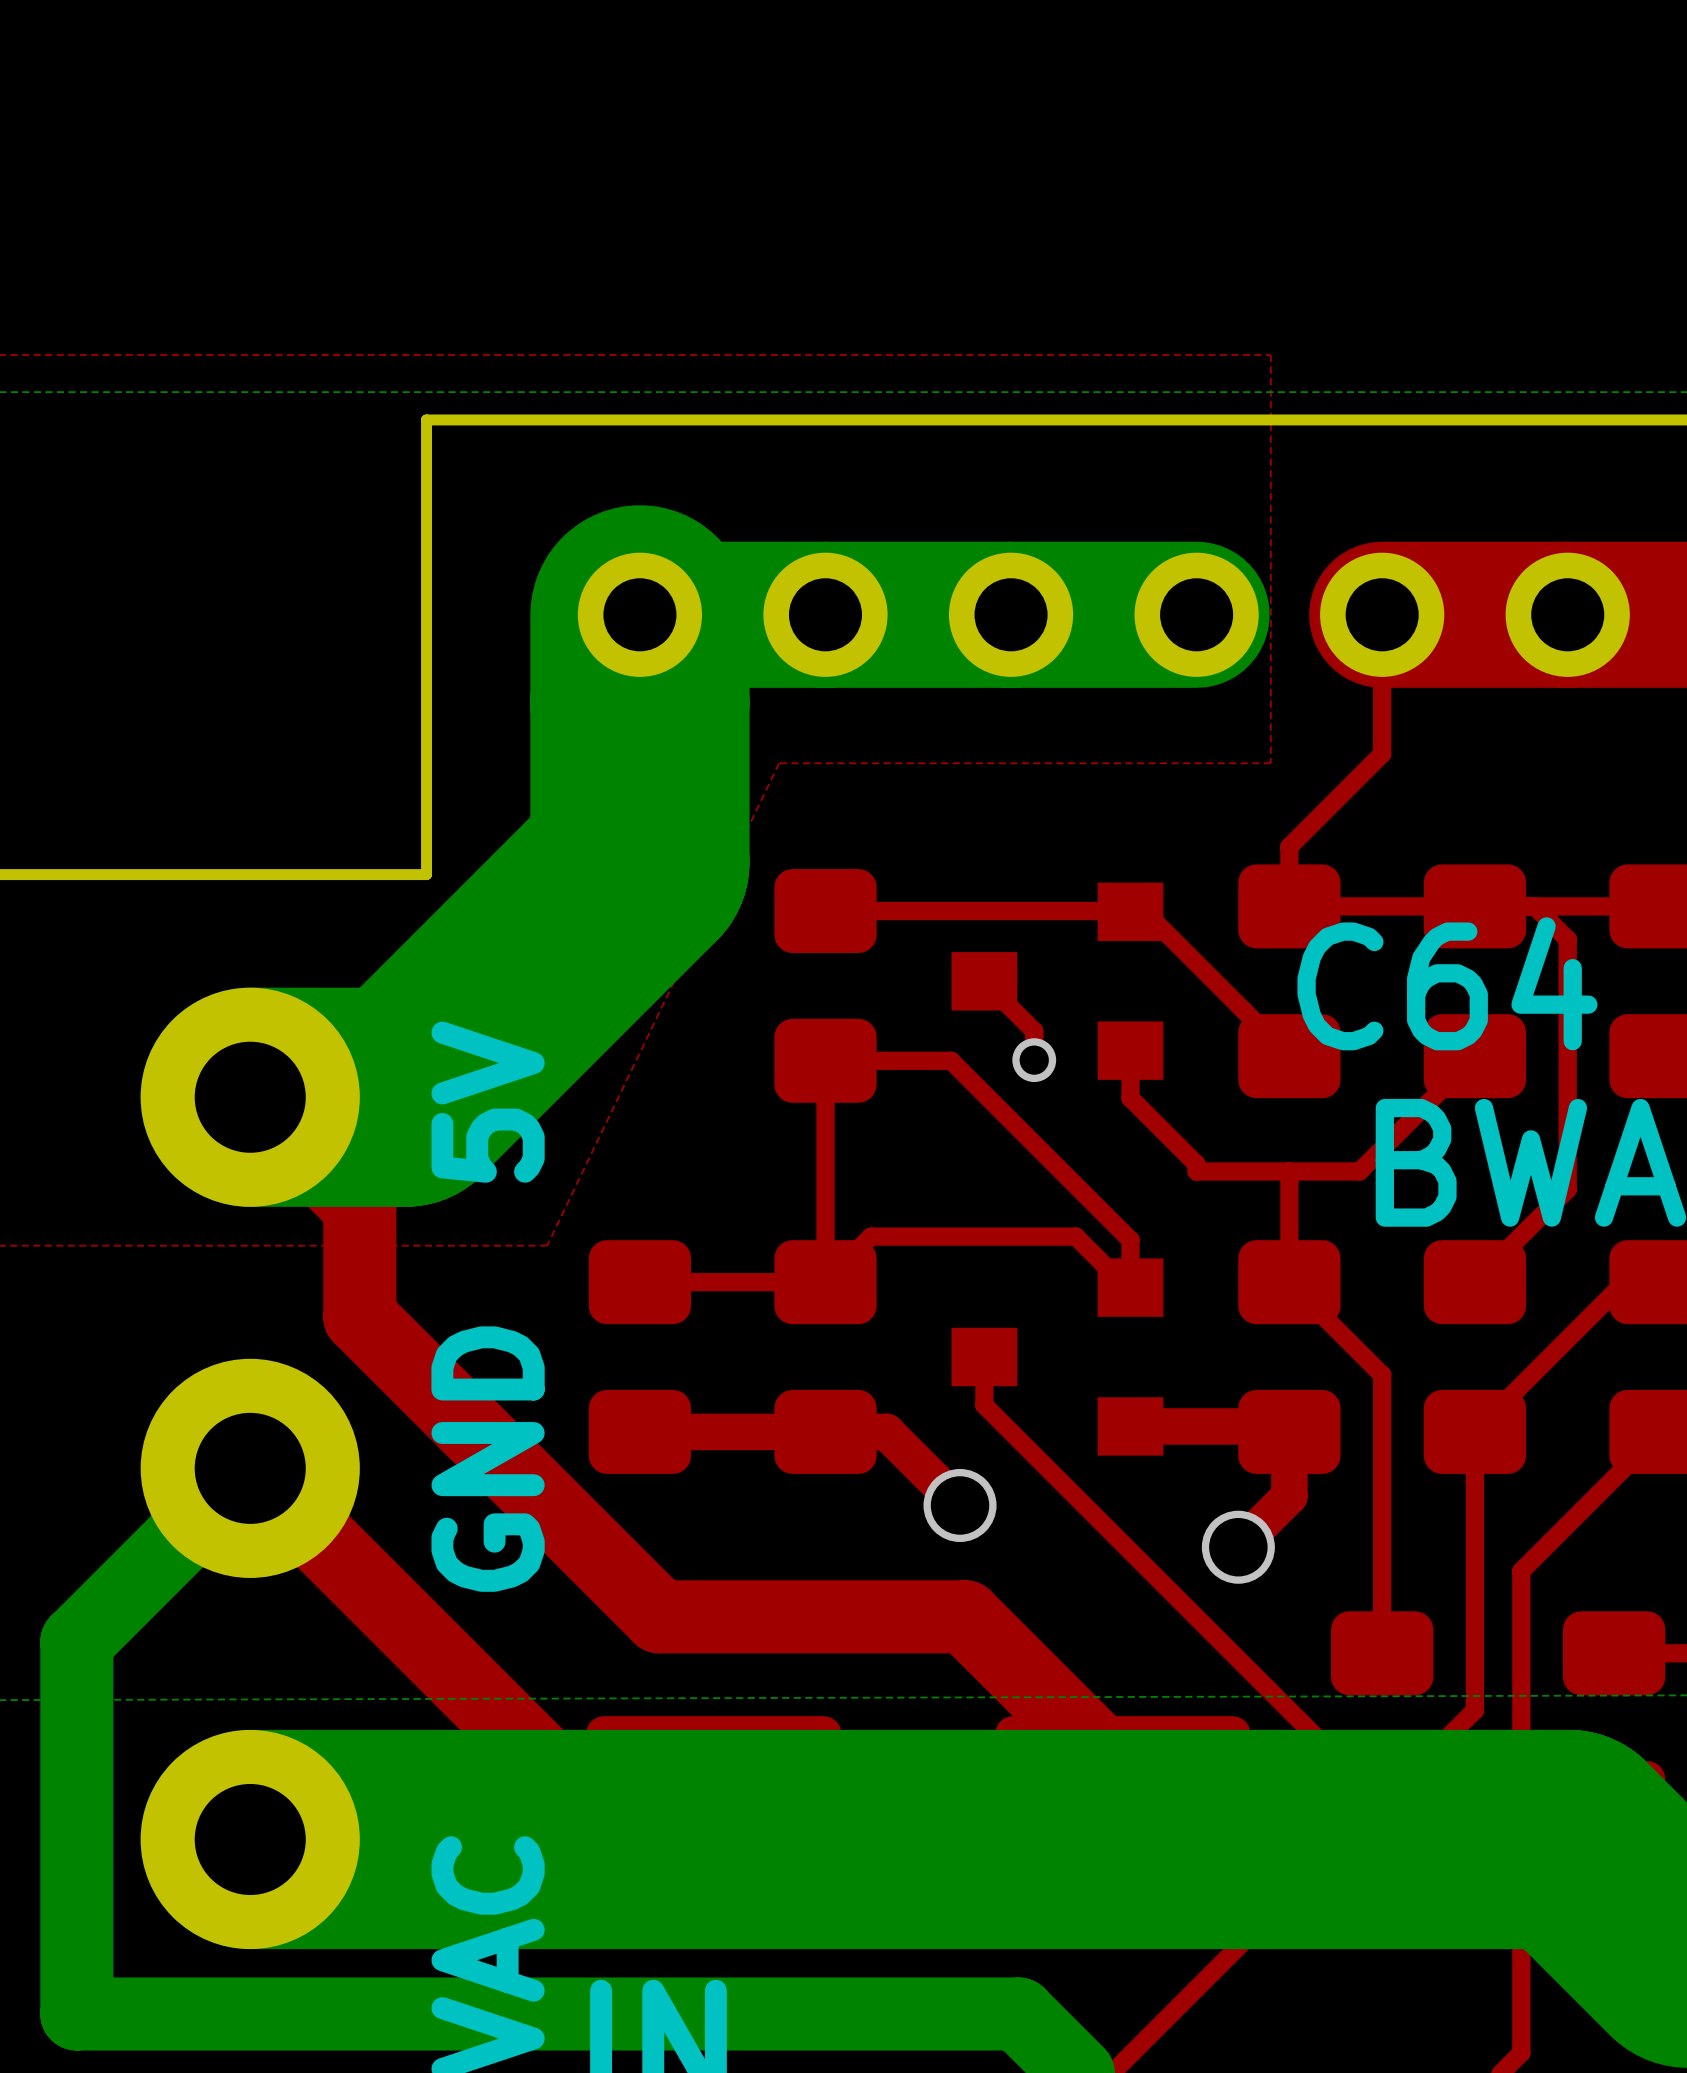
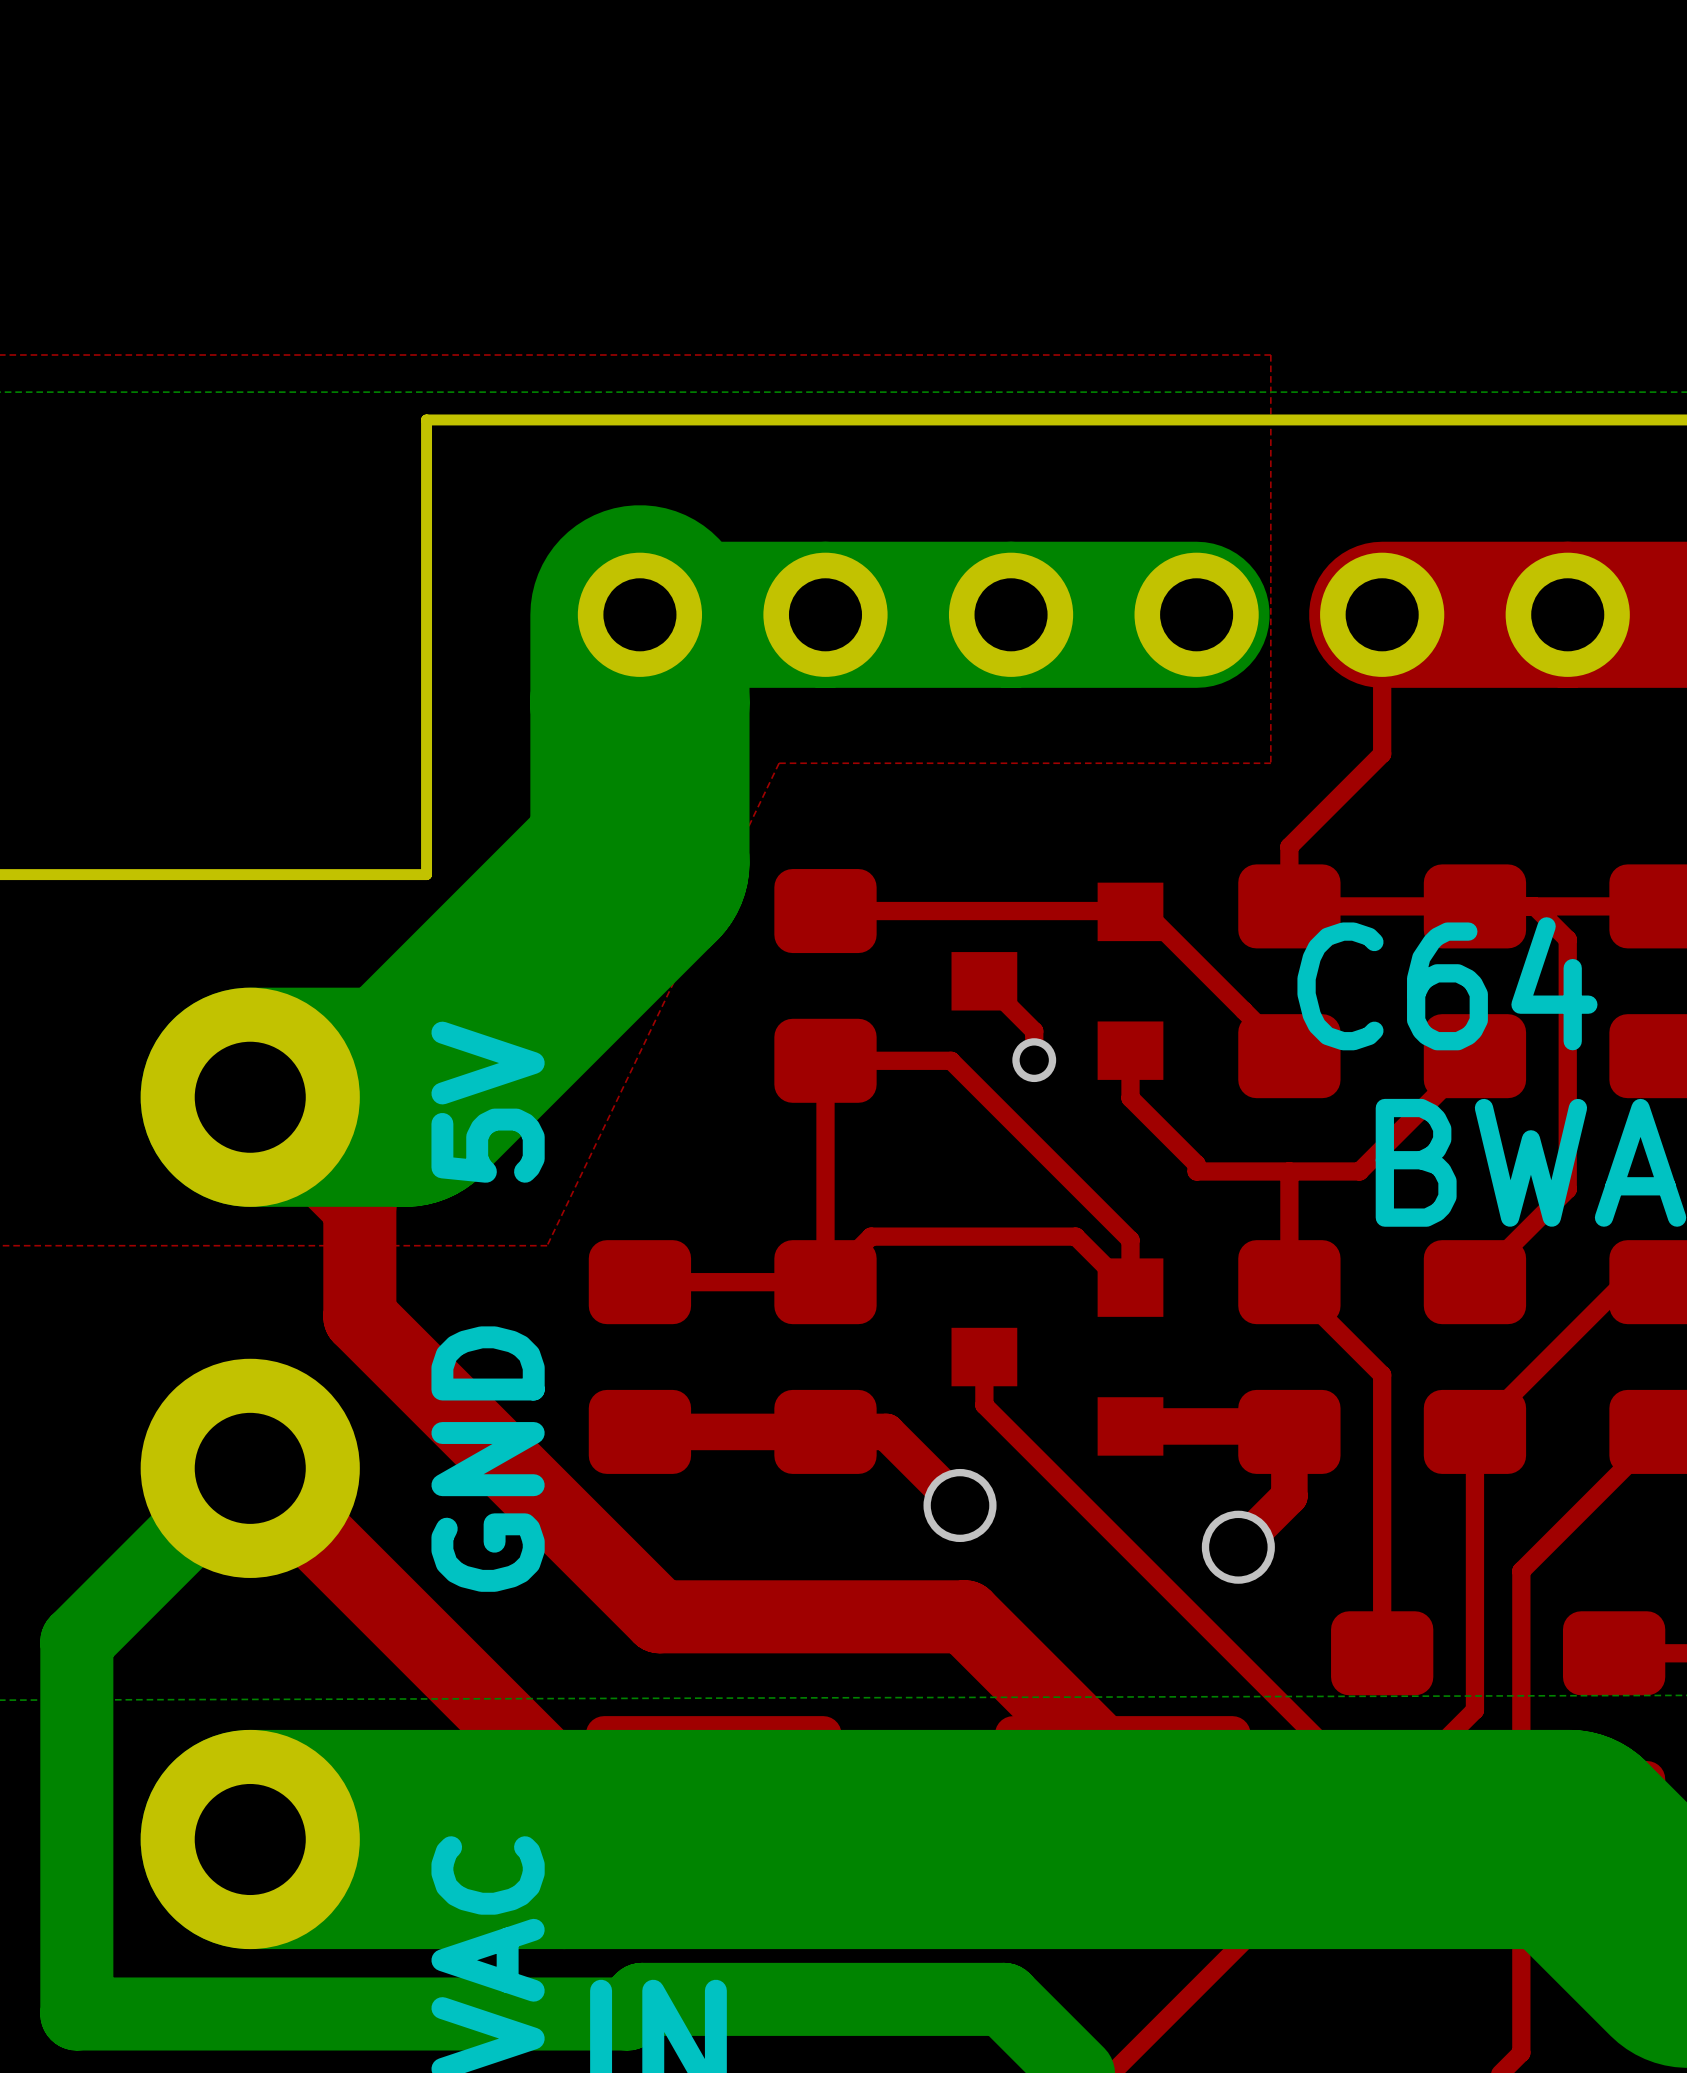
bottom track: (1018, 2014) (627, 2014) -> (1018, 2014) (1003, 1999) (641, 1999) (627, 2014)

